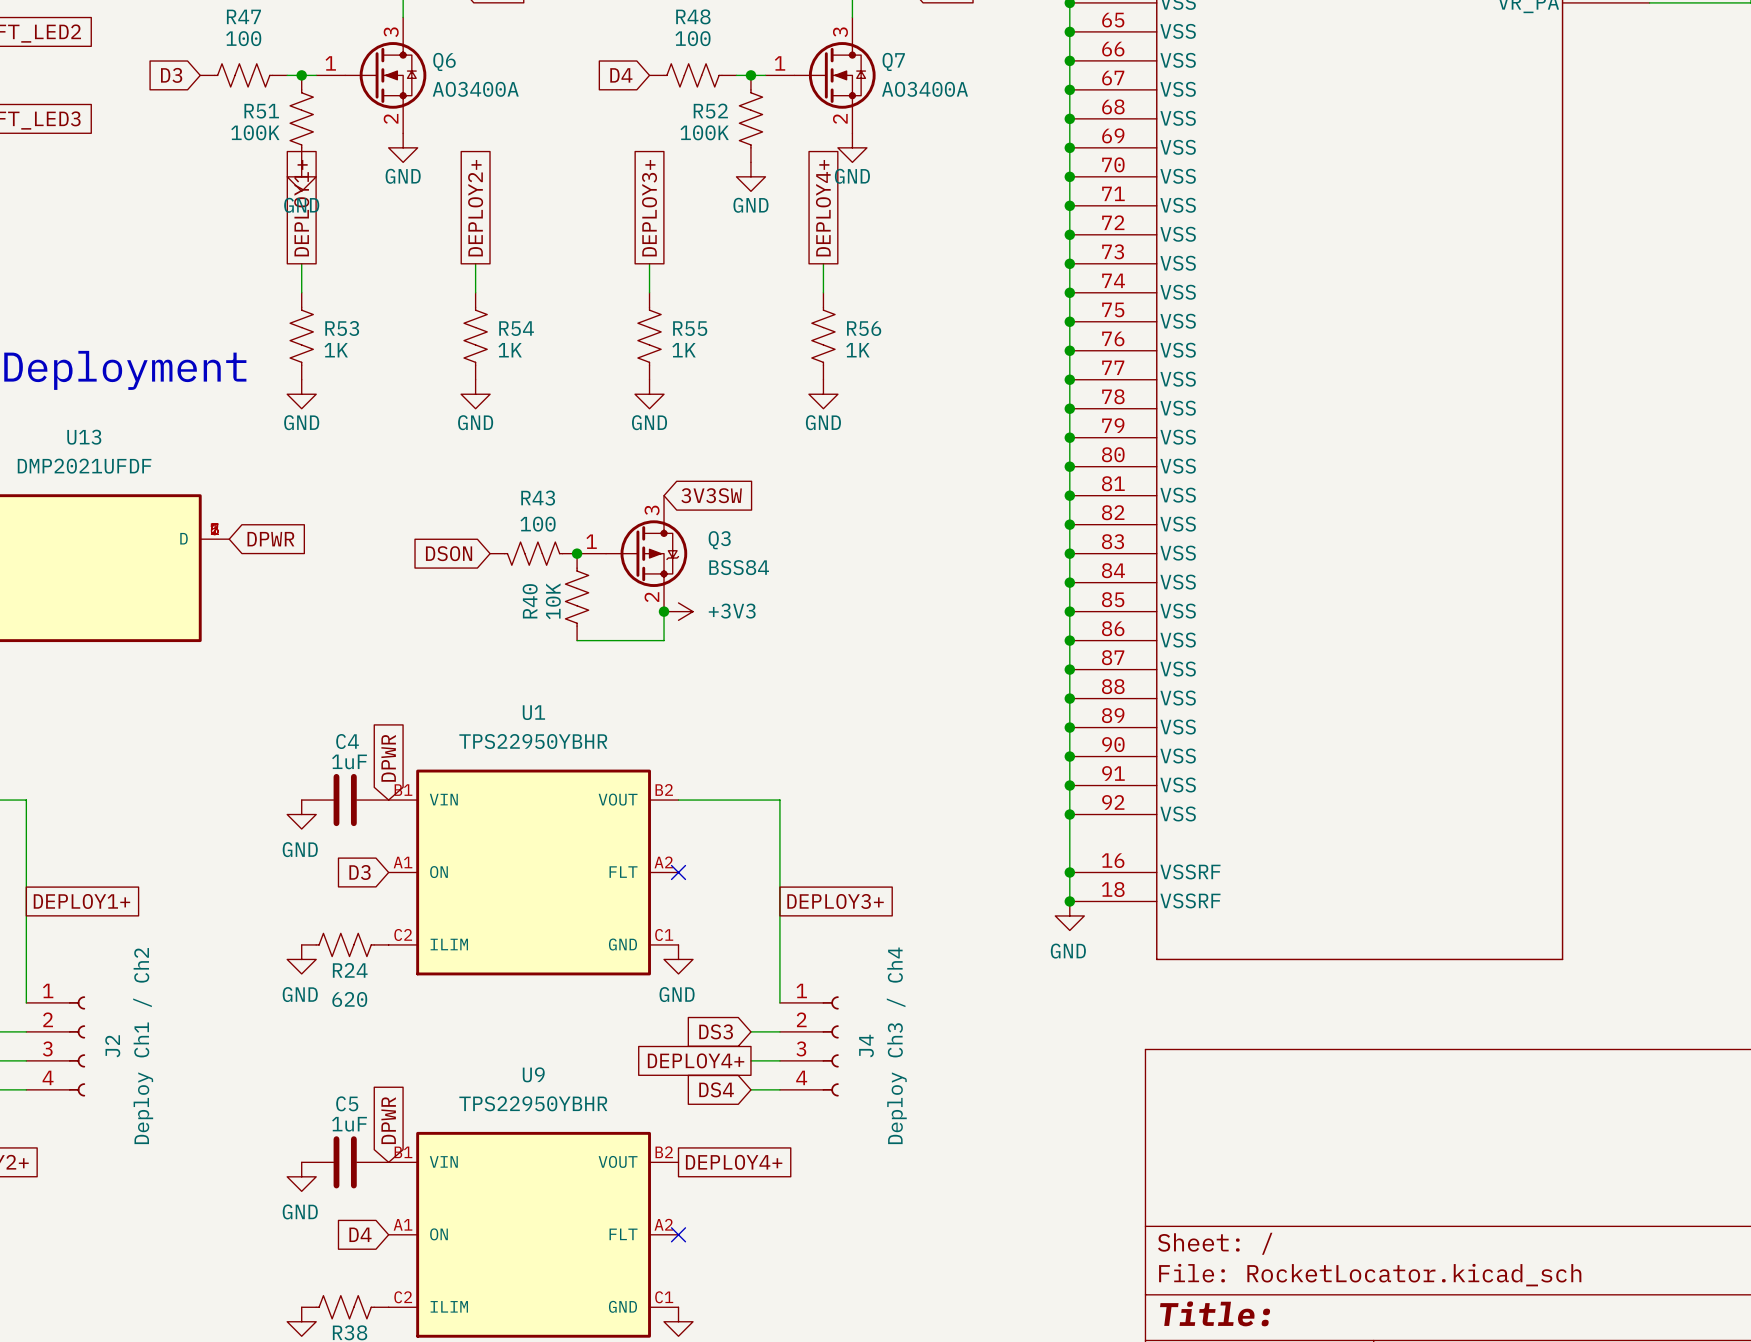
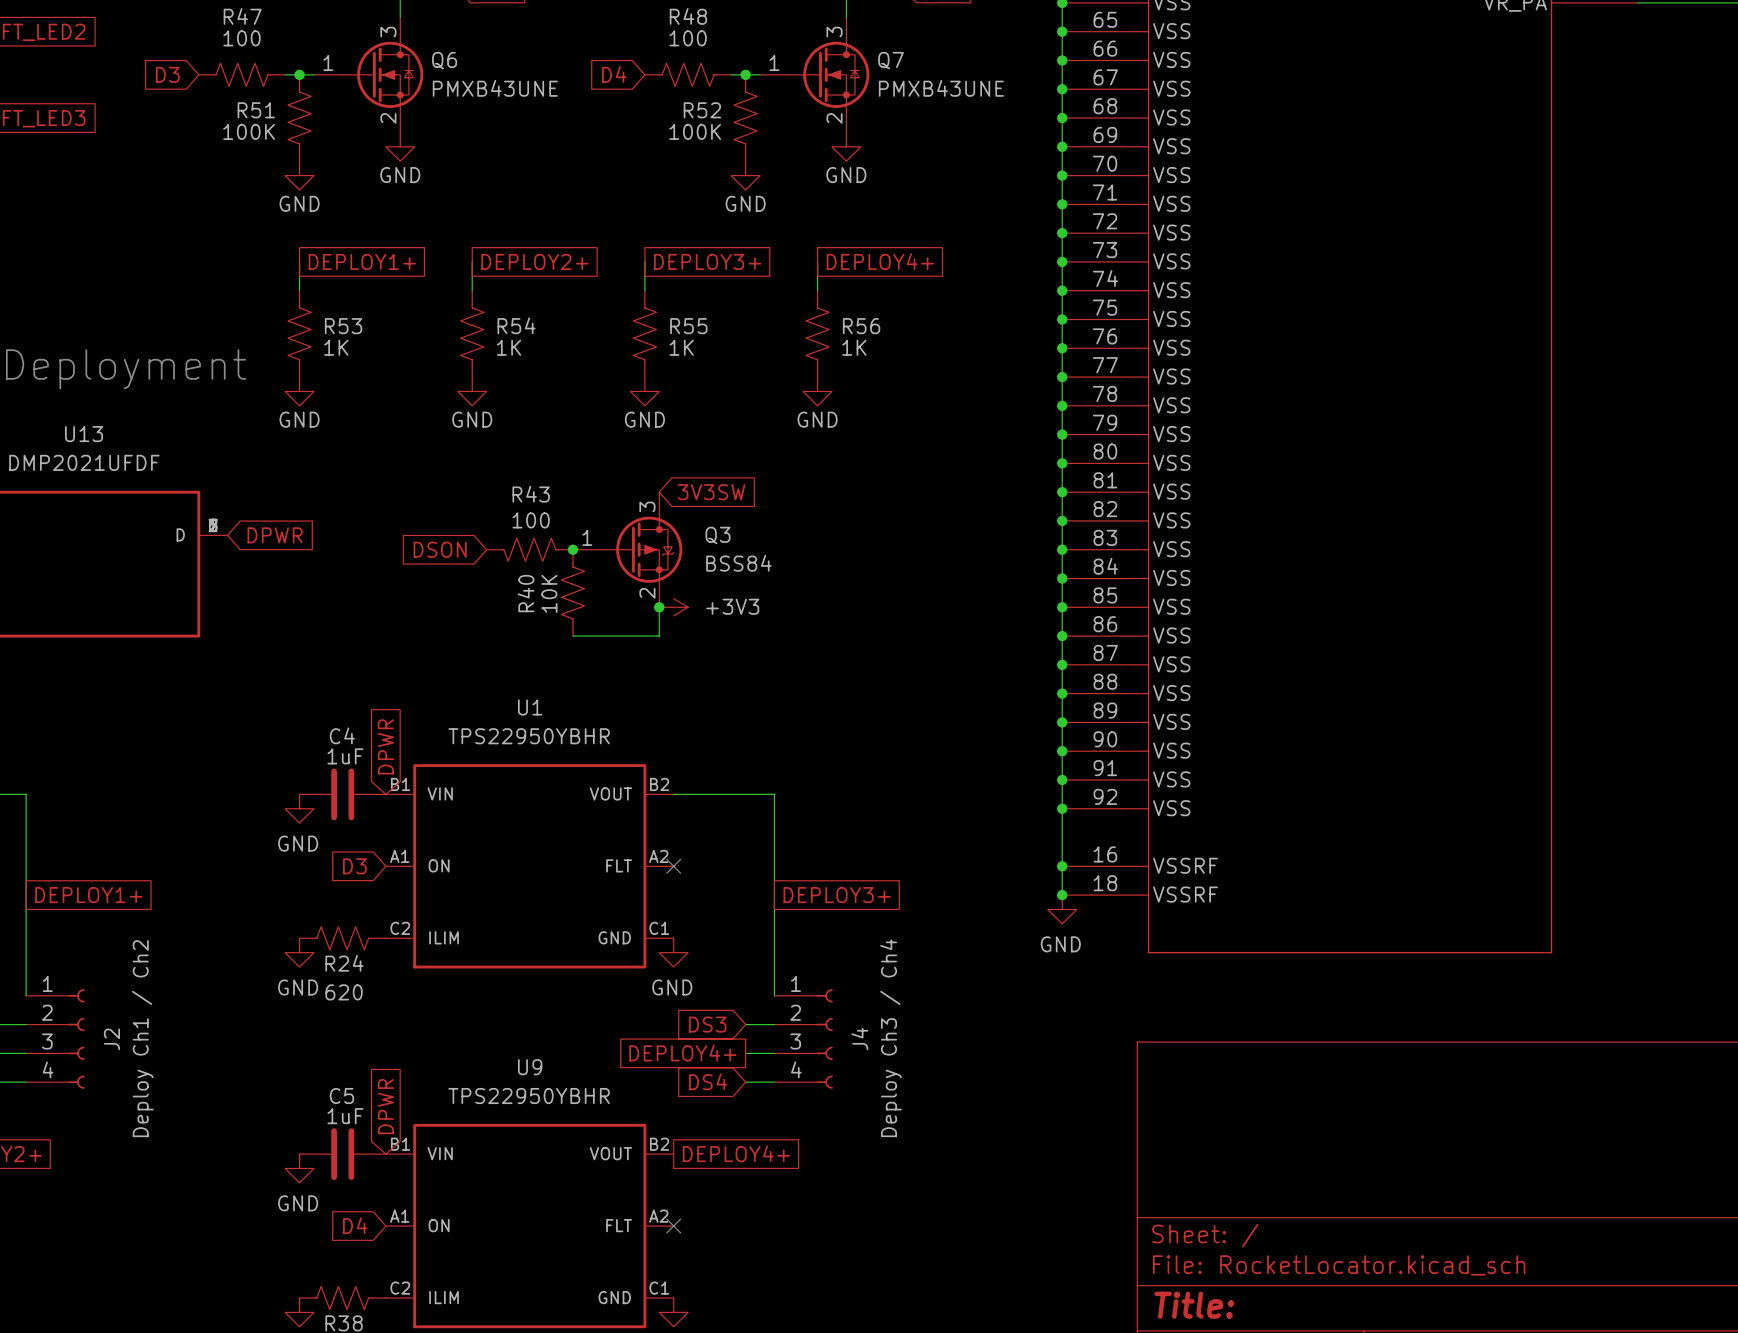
Q6 value: AO3400A (475, 89) -> PMXB43UNE (495, 88)
Q7 value: AO3400A (925, 89) -> PMXB43UNE (941, 88)
global label rotation: 0° (301, 208) -> 90° clockwise (362, 261)
global label rotation: 0° (475, 208) -> 90° clockwise (534, 261)
global label rotation: 0° (649, 208) -> 90° clockwise (707, 261)
global label rotation: 0° (823, 208) -> 90° clockwise (880, 261)

